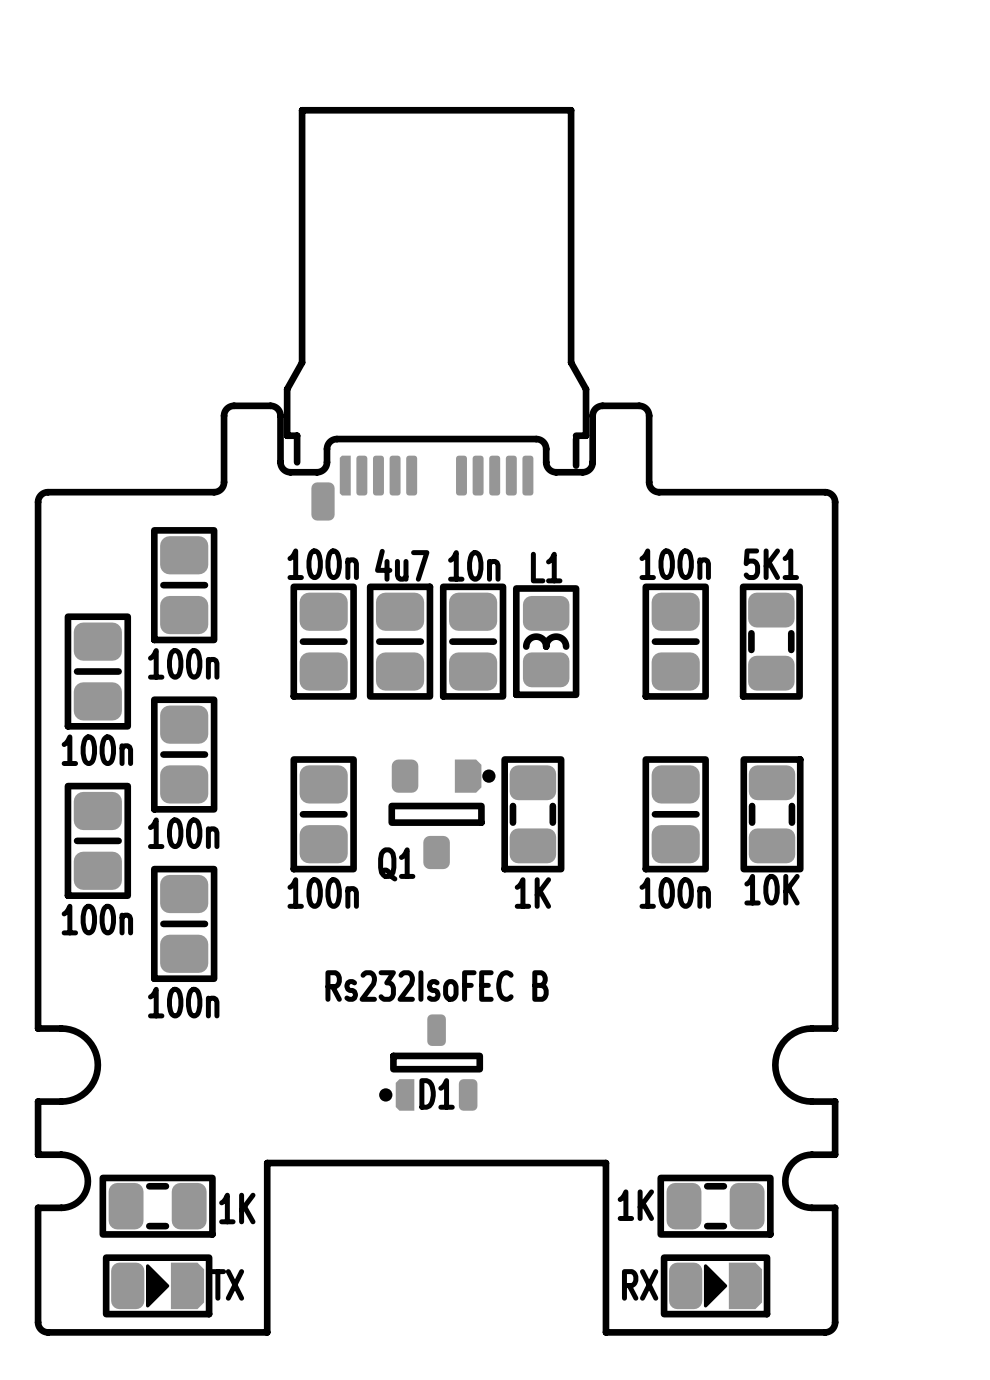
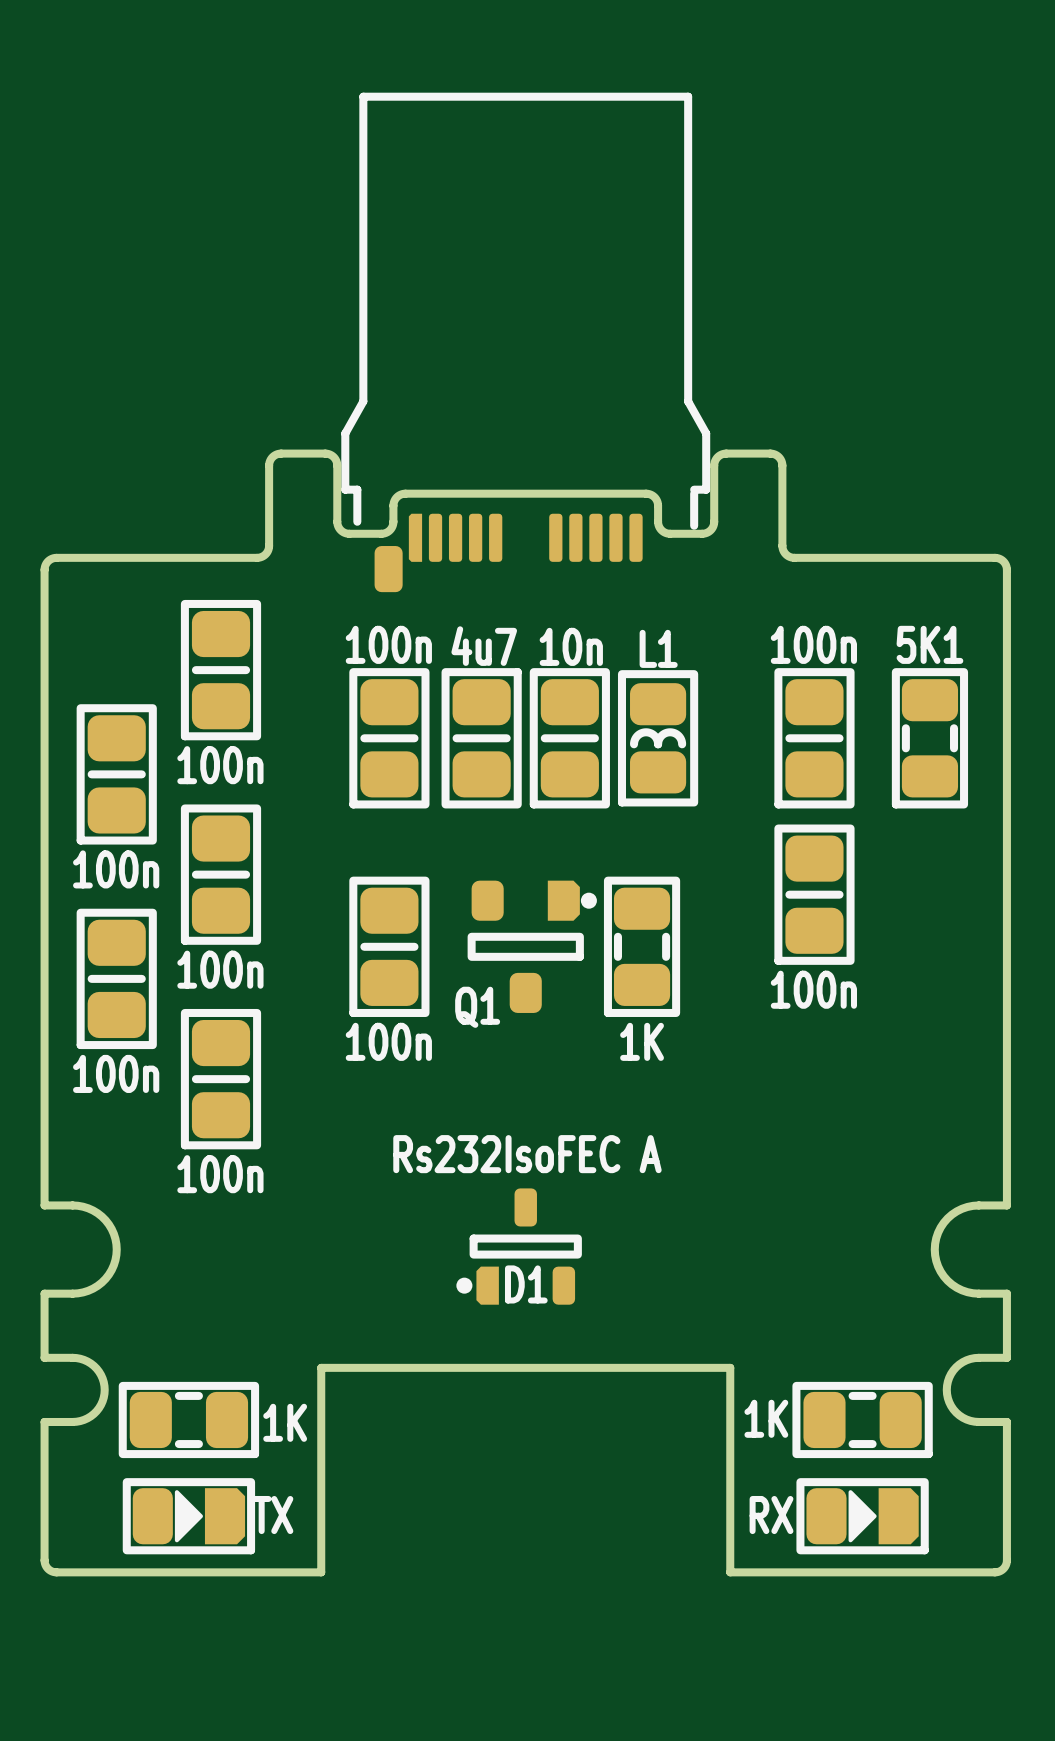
part position: (675, 814) -> (814, 894)
part: 10K (772, 814) -> none
text: Rs232IsoFEC B (437, 986) -> Rs232IsoFEC A (527, 1154)

